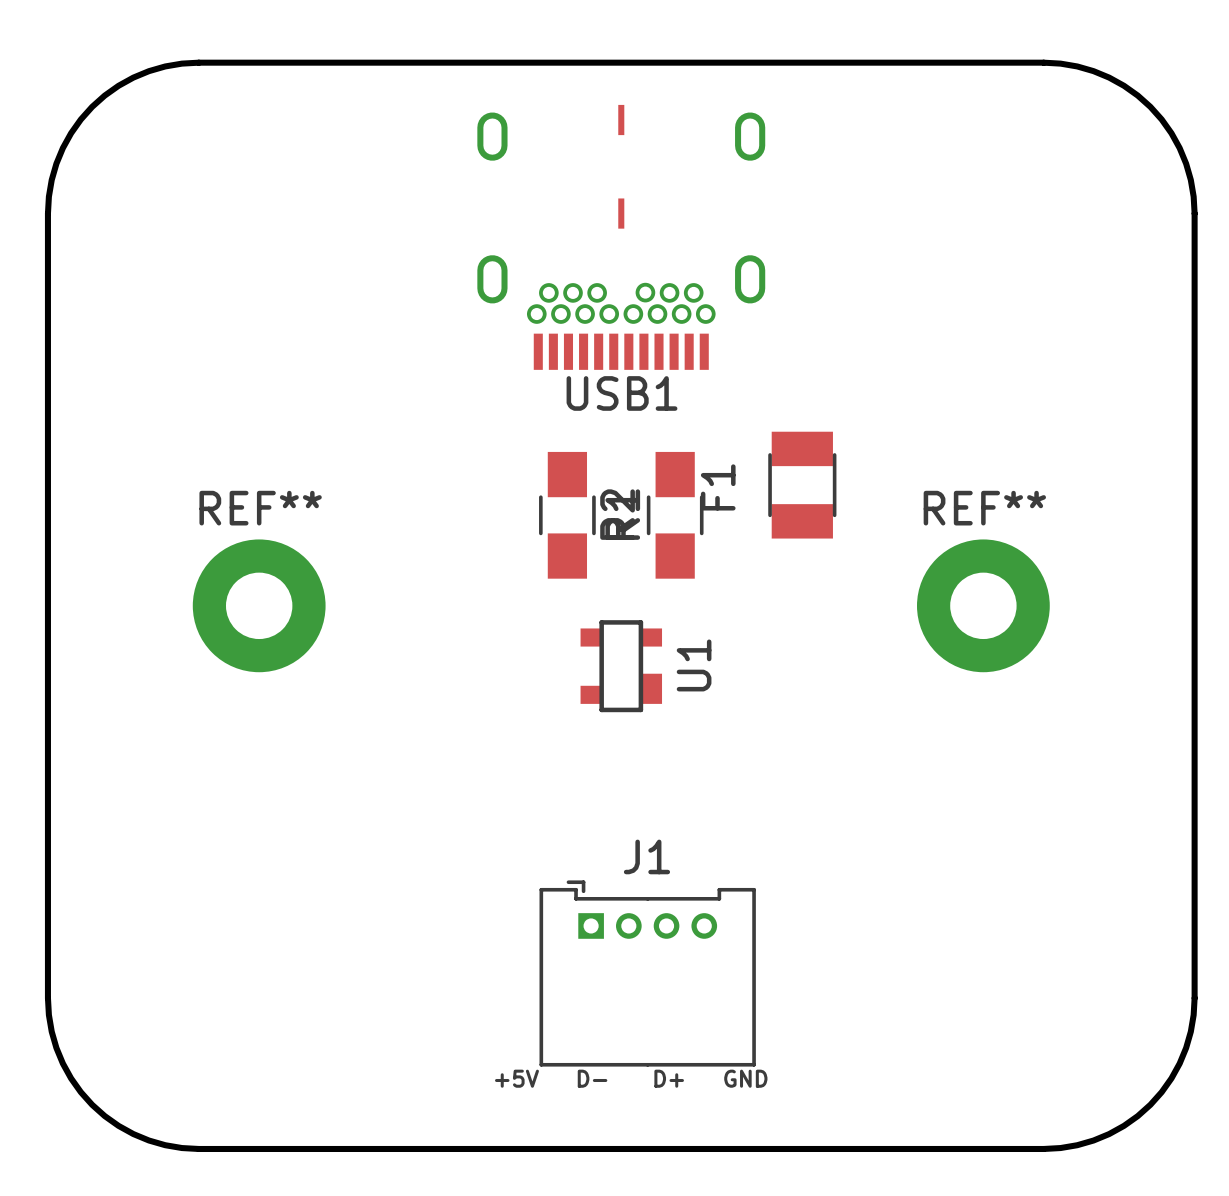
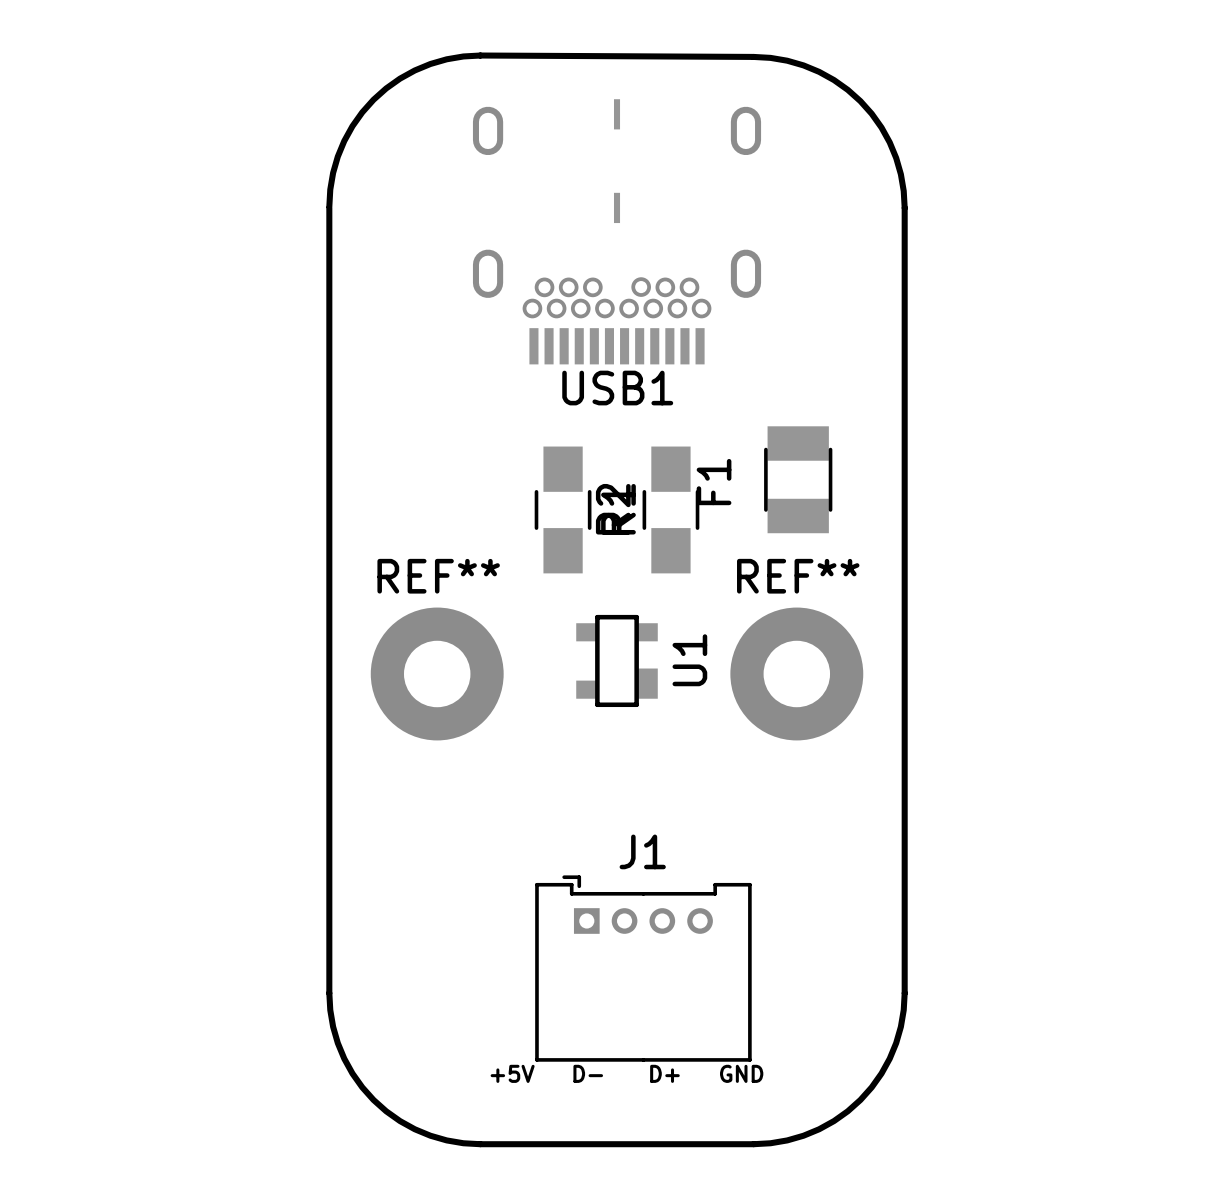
board edge: none -> (329, 207) (330, 1010) (337, 1043) (344, 1058) (352, 1073) (373, 1099) (400, 1121) (430, 1135) (463, 1143) (480, 1144)
REF** position: (259, 605) -> (437, 674)
REF** position: (983, 605) -> (796, 674)
board edge: (484, 1148) (198, 1148) (165, 1145) (149, 1140) (118, 1125) (92, 1104) (71, 1078) (56, 1047) (48, 1015) (47, 998) (48, 196) (56, 163) (71, 133) (80, 119) (104, 95) (133, 77) (149, 71) (165, 66) (198, 62) (1060, 63) (1093, 71) (1124, 85) (1150, 106) (1171, 133) (1186, 163) (1190, 179) (1194, 213) (1194, 998) (1193, 1015) (1186, 1047) (1171, 1078) (1150, 1104) (1124, 1125) (1093, 1140) (1077, 1145) (1043, 1148) (757, 1148) -> (329, 206) (330, 189) (337, 156) (352, 126) (373, 99) (386, 88) (414, 70) (446, 59) (463, 56) (753, 56) (787, 60) (819, 71) (847, 89) (871, 113) (889, 142) (900, 174) (904, 207) (903, 1010) (896, 1043) (889, 1058) (881, 1073) (860, 1099) (834, 1121) (803, 1135) (770, 1143) (753, 1144)

